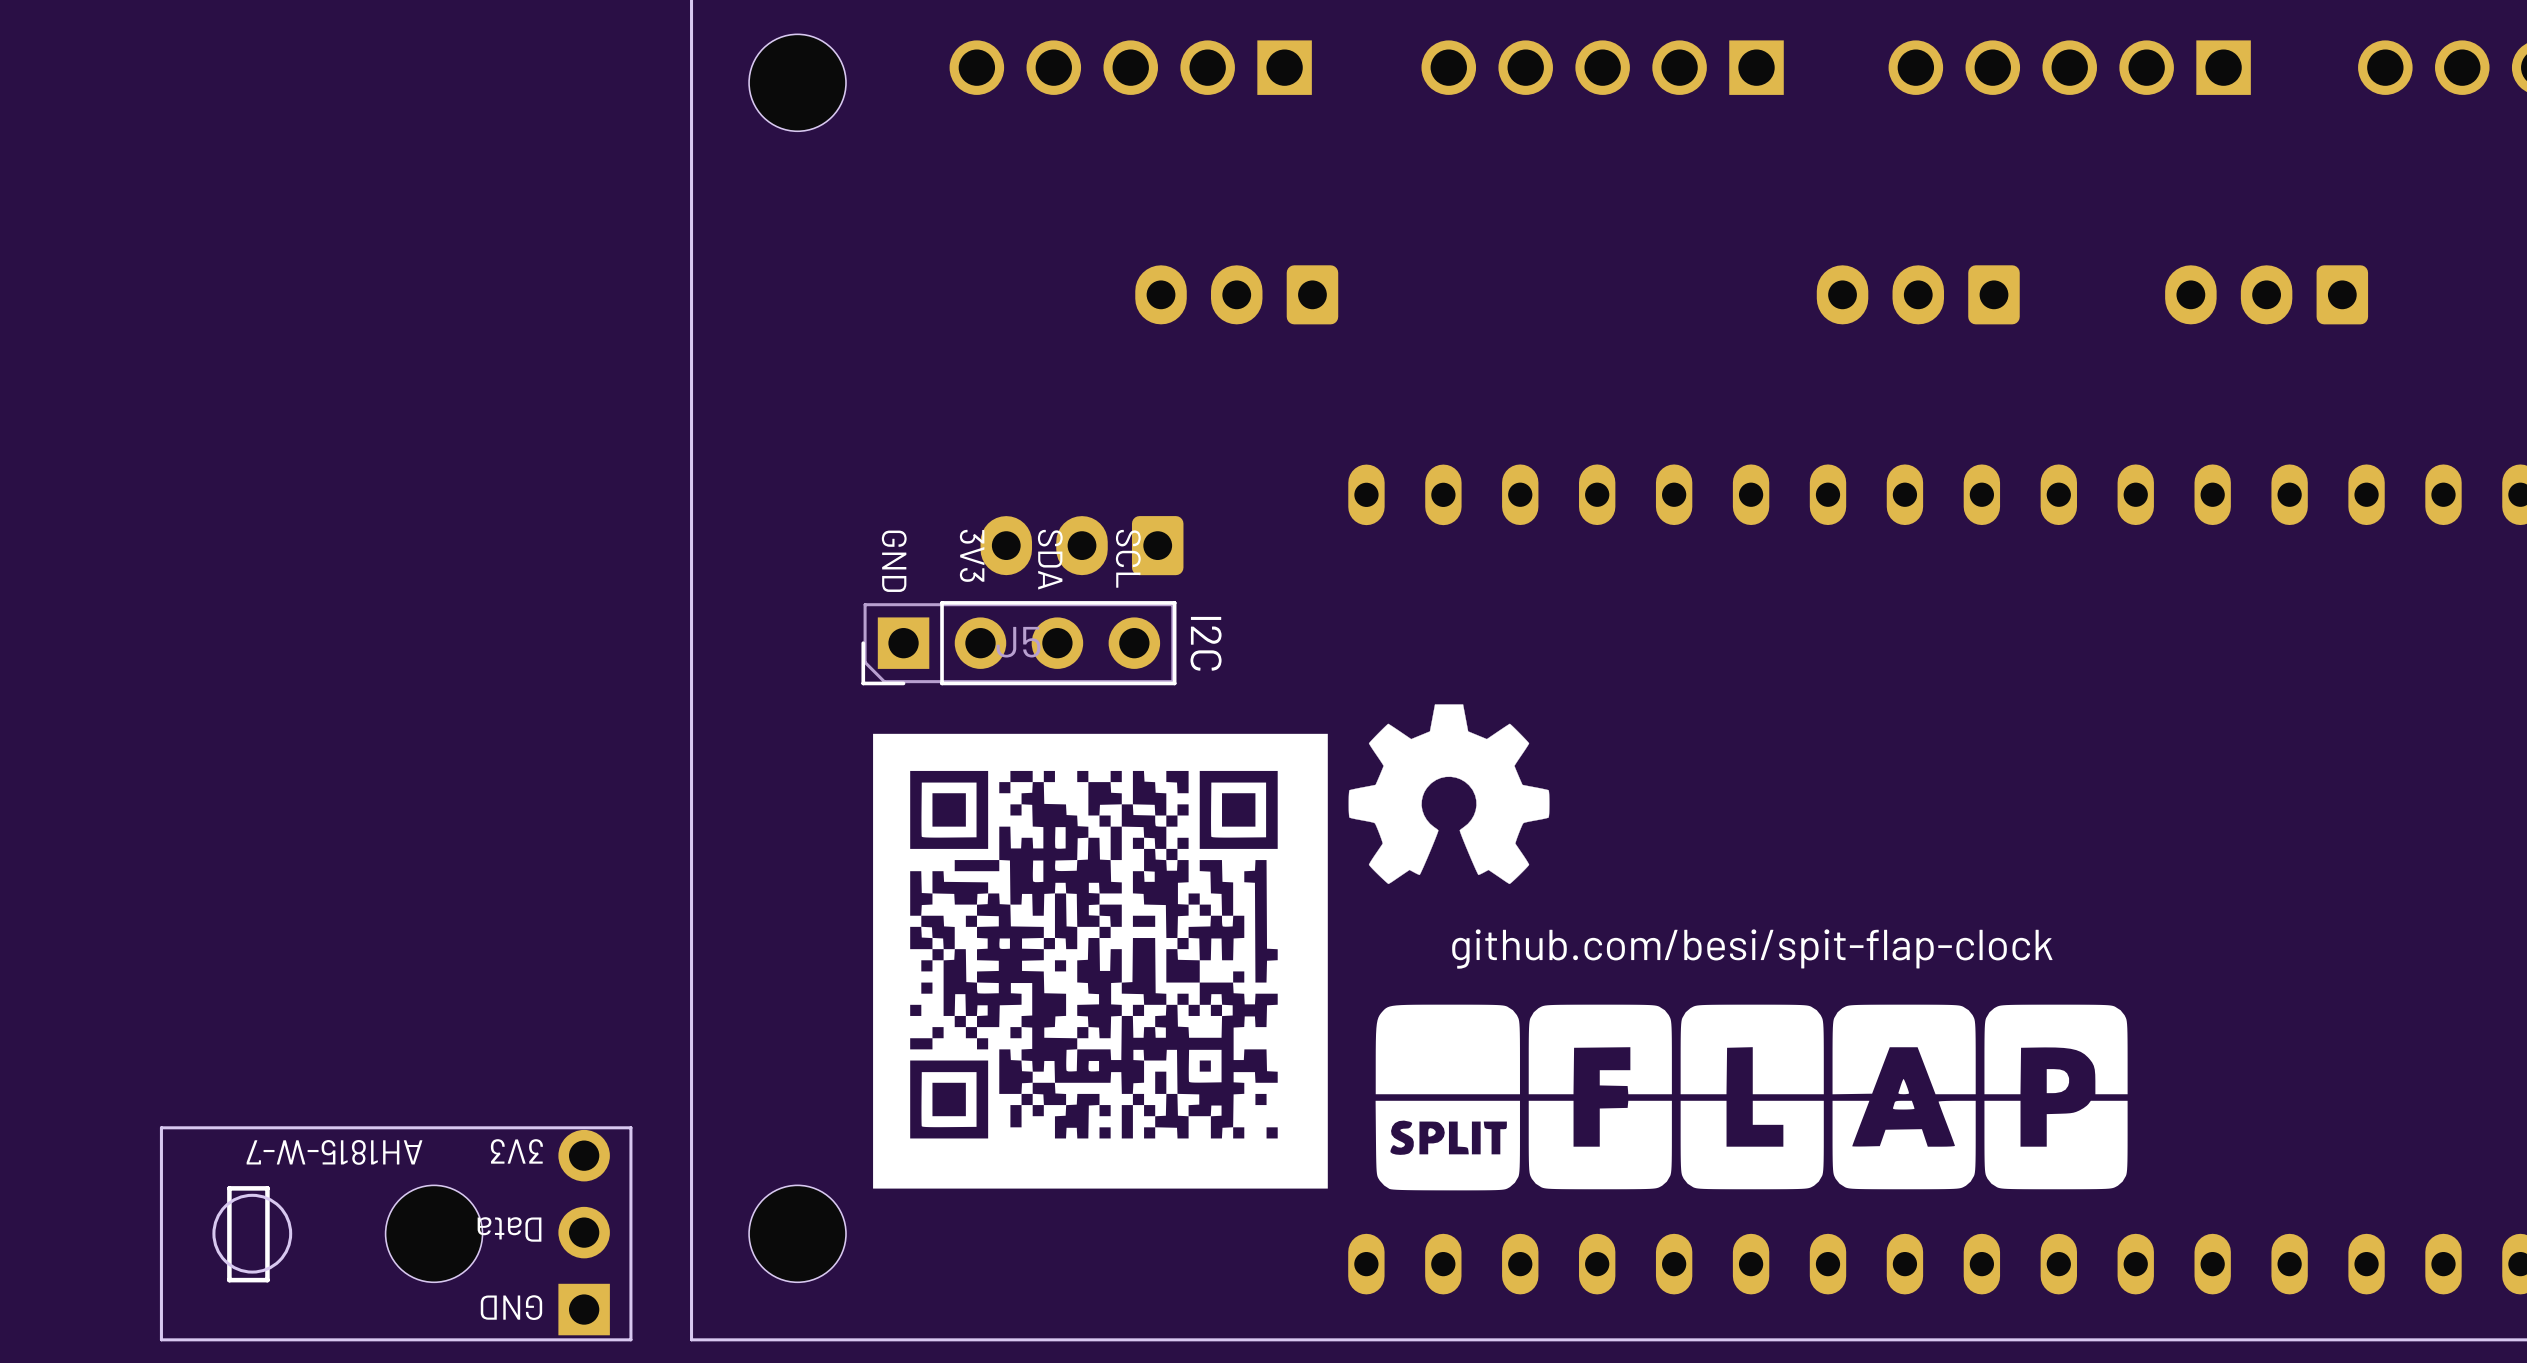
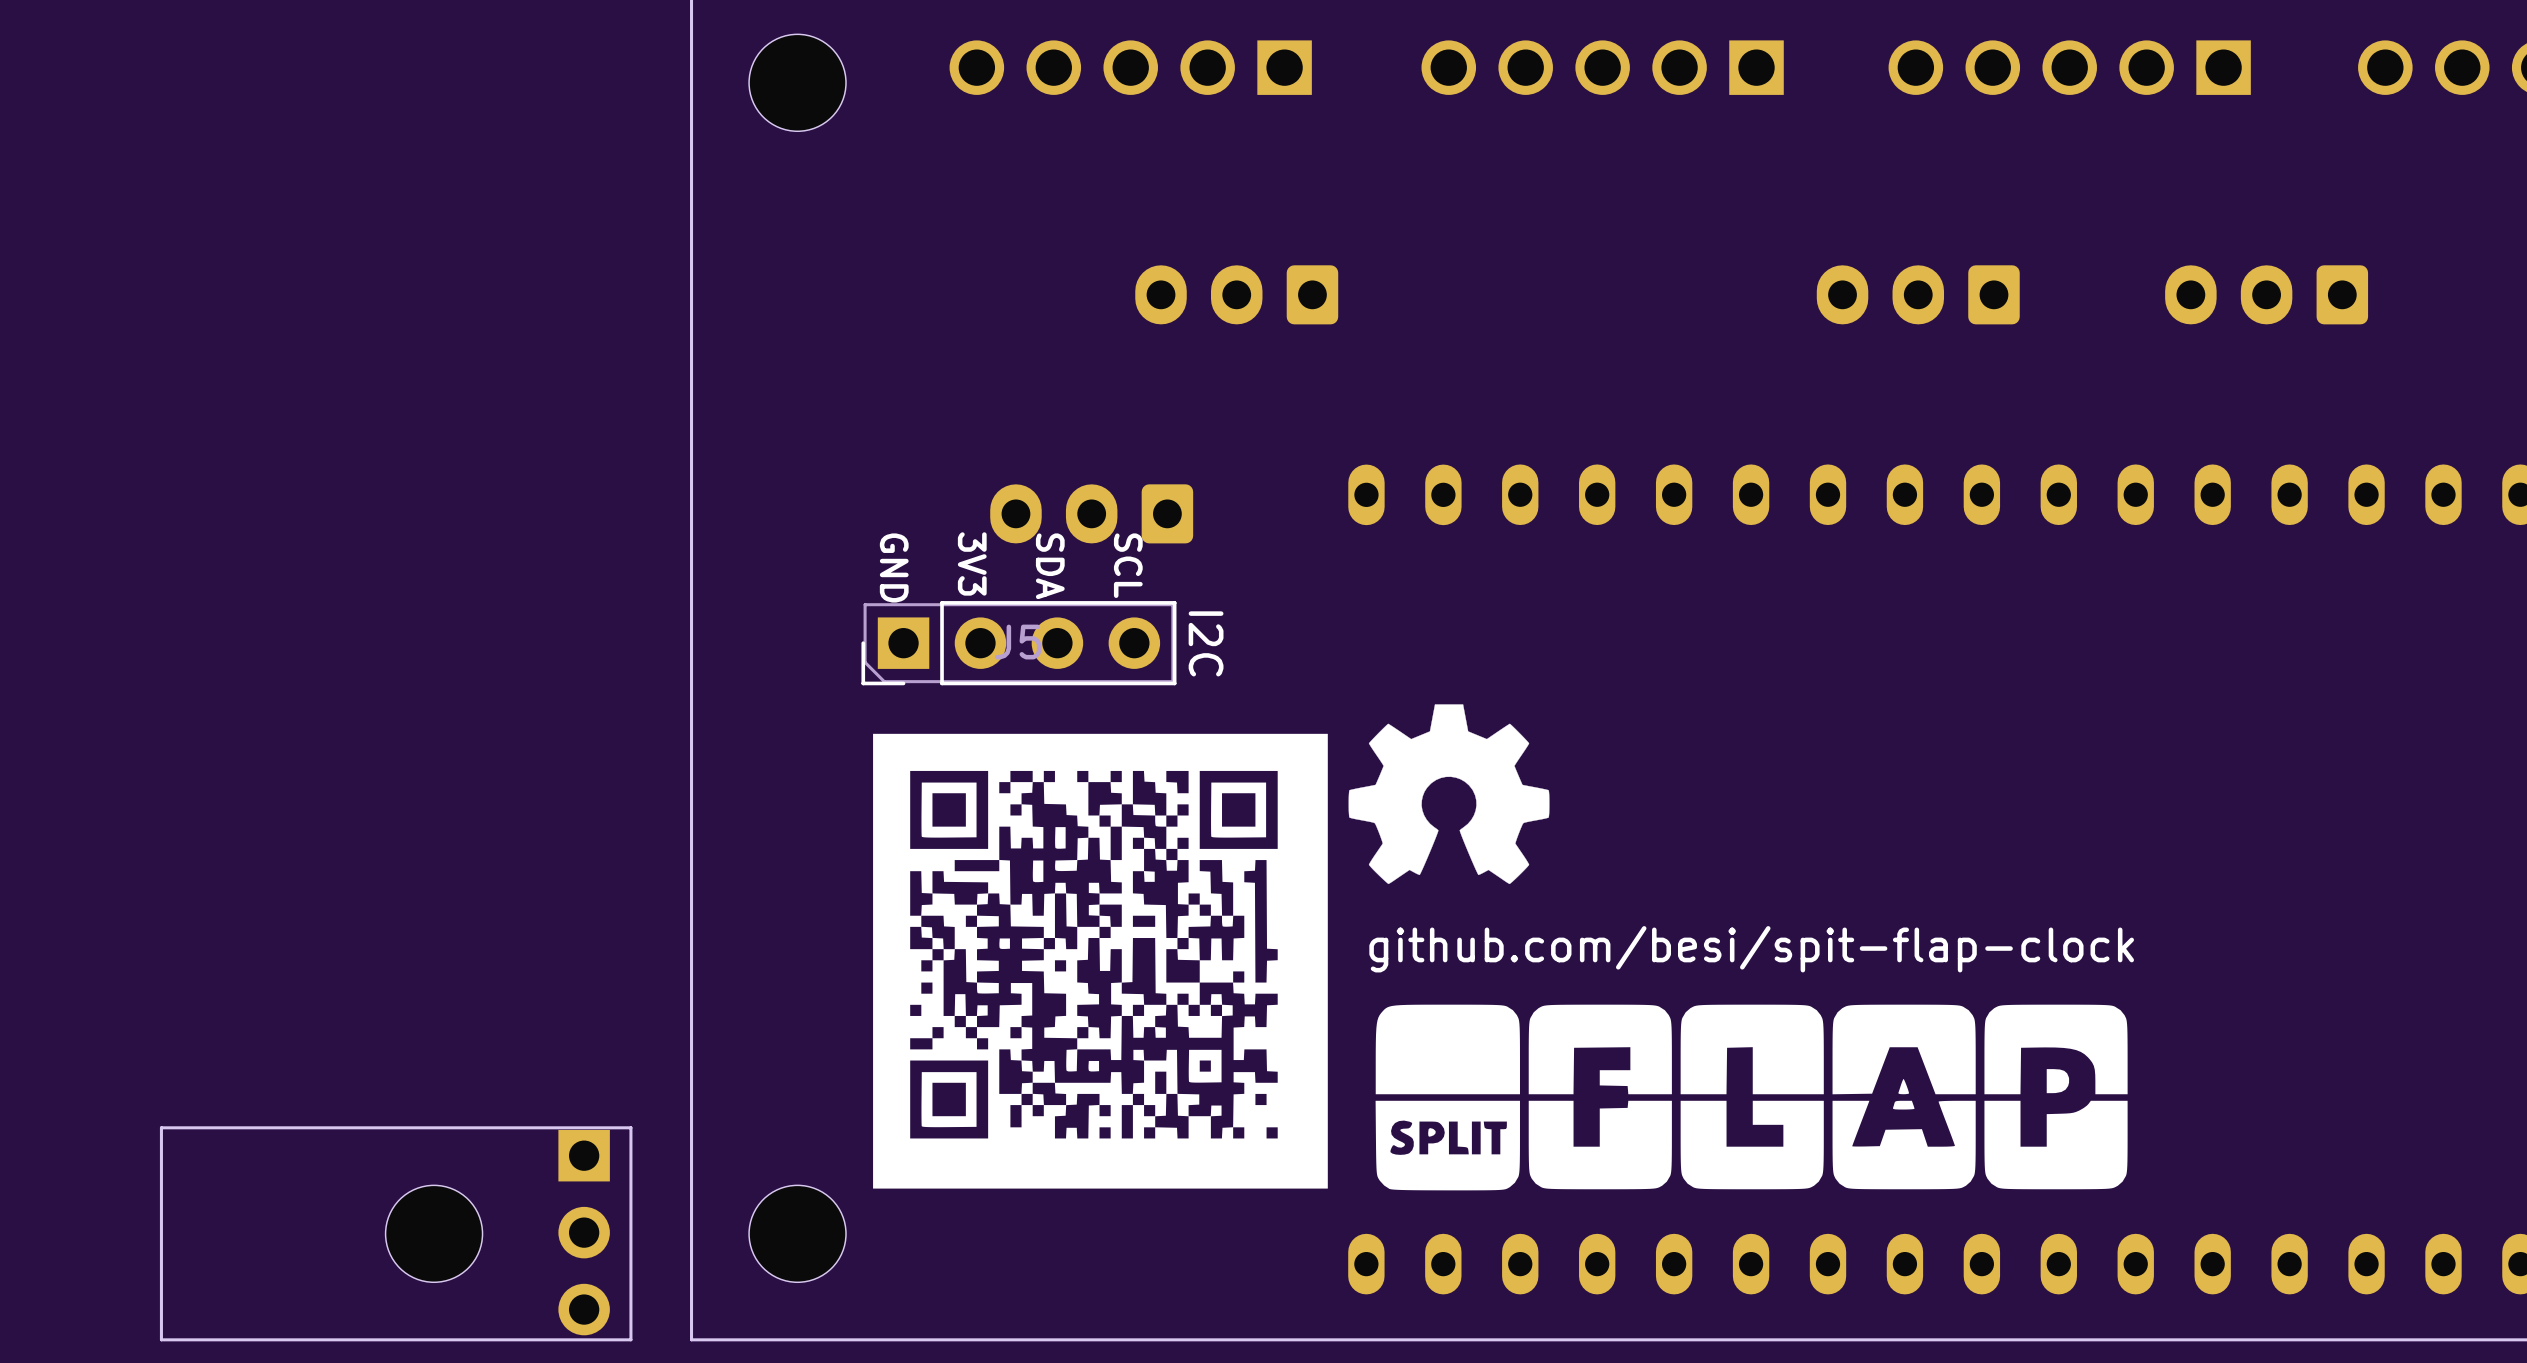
part position: (1081, 545) -> (1091, 513)
text: 3V3 (516, 1151) -> none
text: AH1815-W-7 (334, 1152) -> none
line: (267, 1188) (229, 1188) (229, 1280) (267, 1280) (267, 1188) -> none
round board edge: [212, 1193, 293, 1274] -> none
text: Data (509, 1229) -> none
part rotation: 0° (584, 1232) -> 180° (584, 1232)
text: GND (511, 1307) -> none

